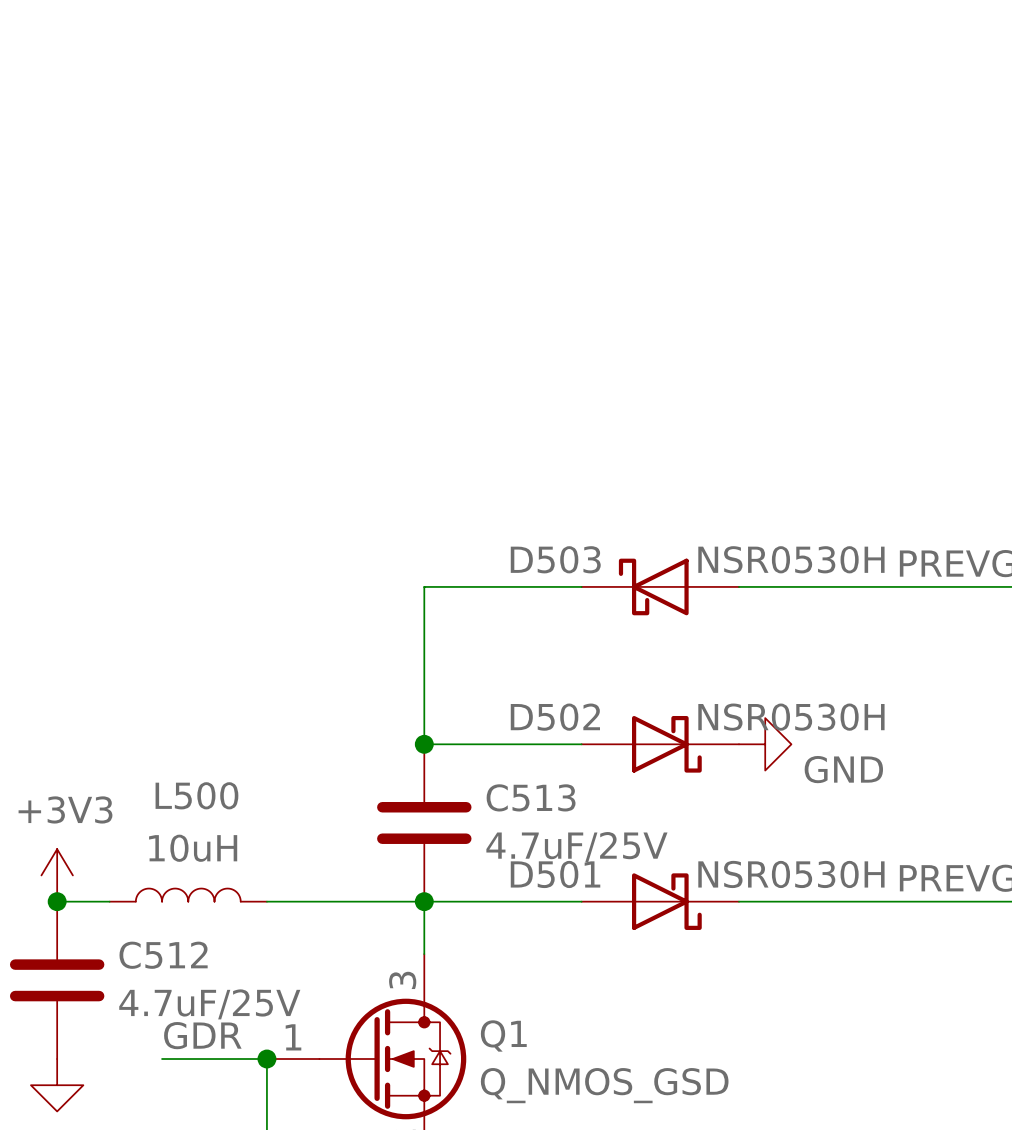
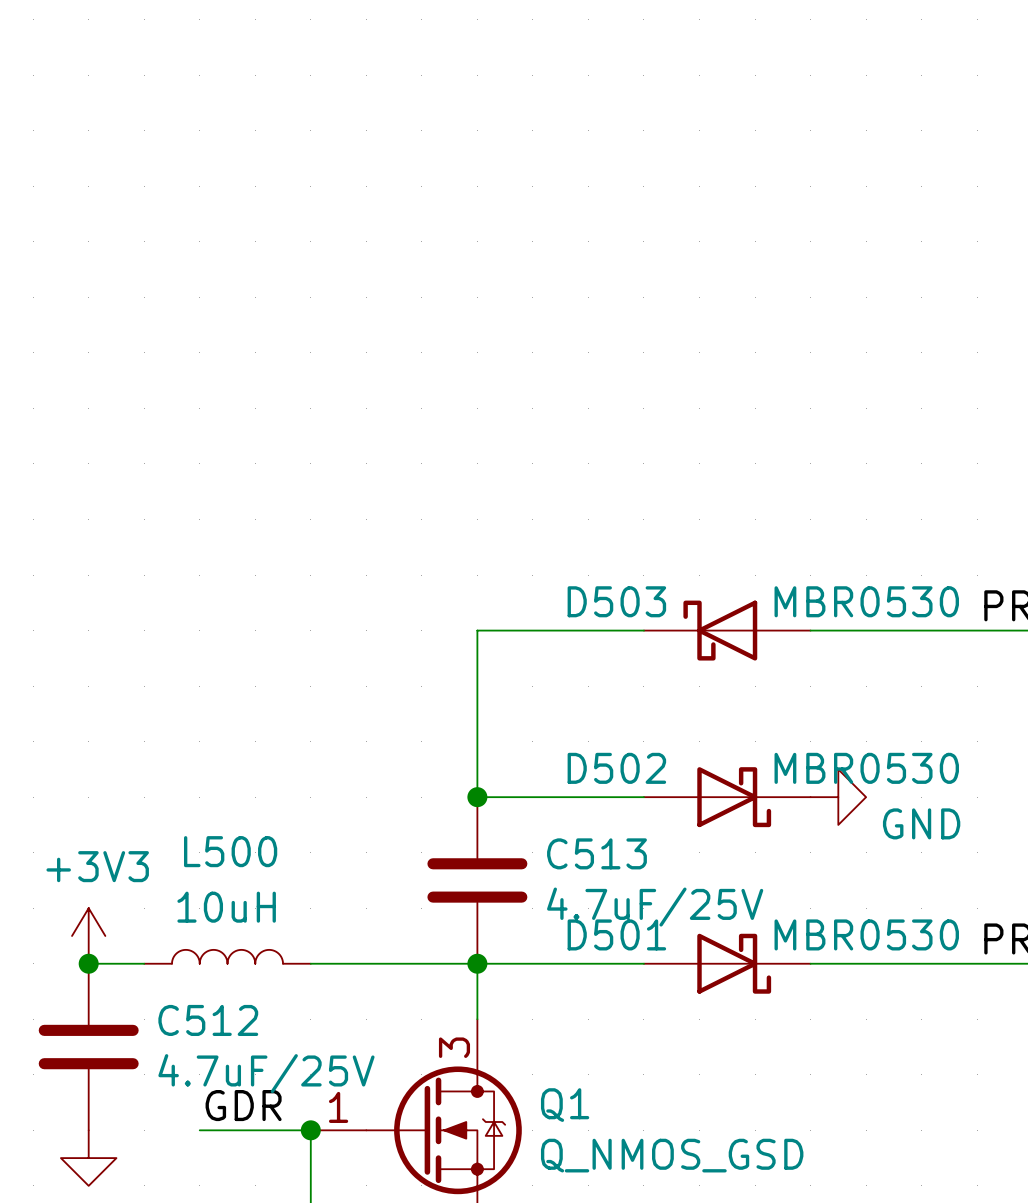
D503 value: NSR0530H (791, 559) -> MBR0530 (866, 601)
D502 value: NSR0530H (791, 717) -> MBR0530 (866, 768)
D501 value: NSR0530H (791, 874) -> MBR0530 (866, 934)

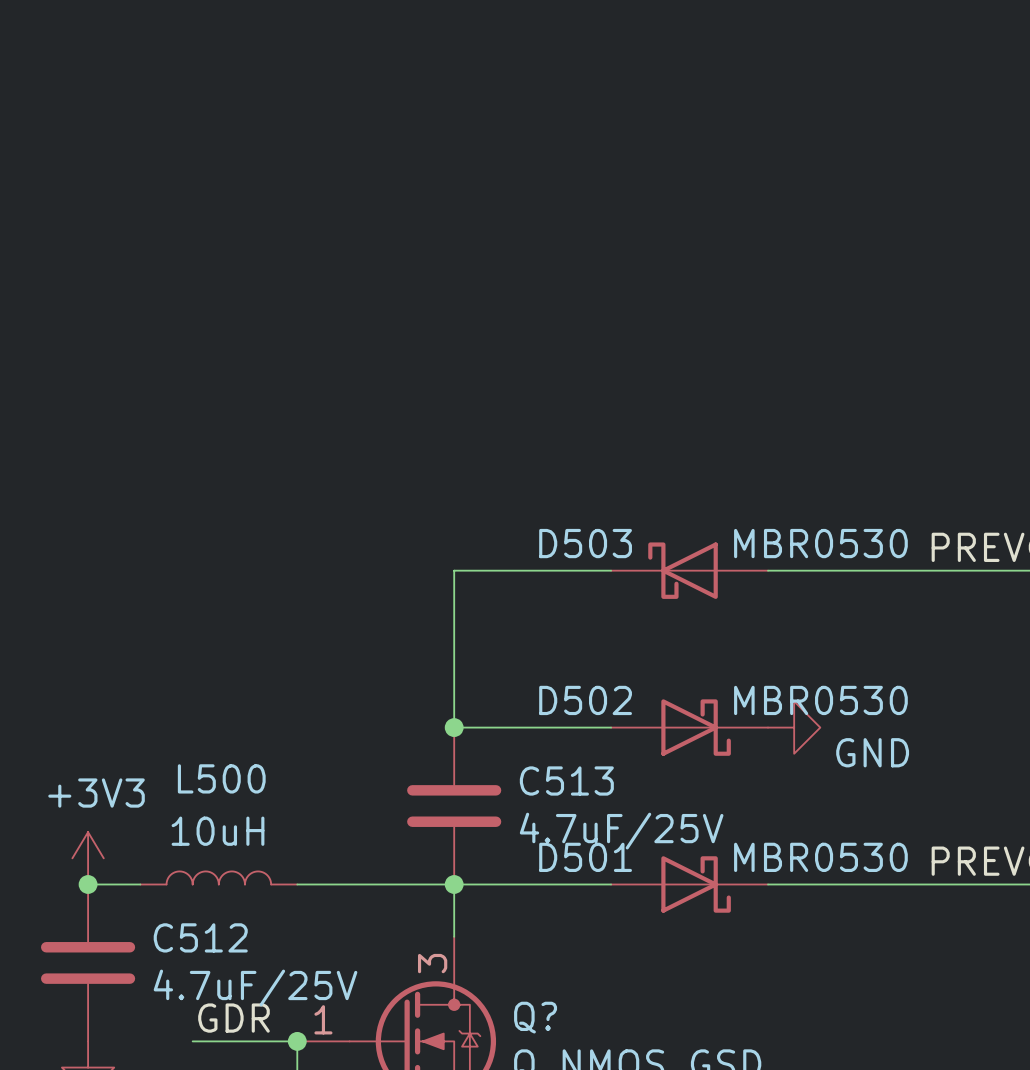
Q1 name: Q1 (565, 1105) -> Q? (535, 1017)

